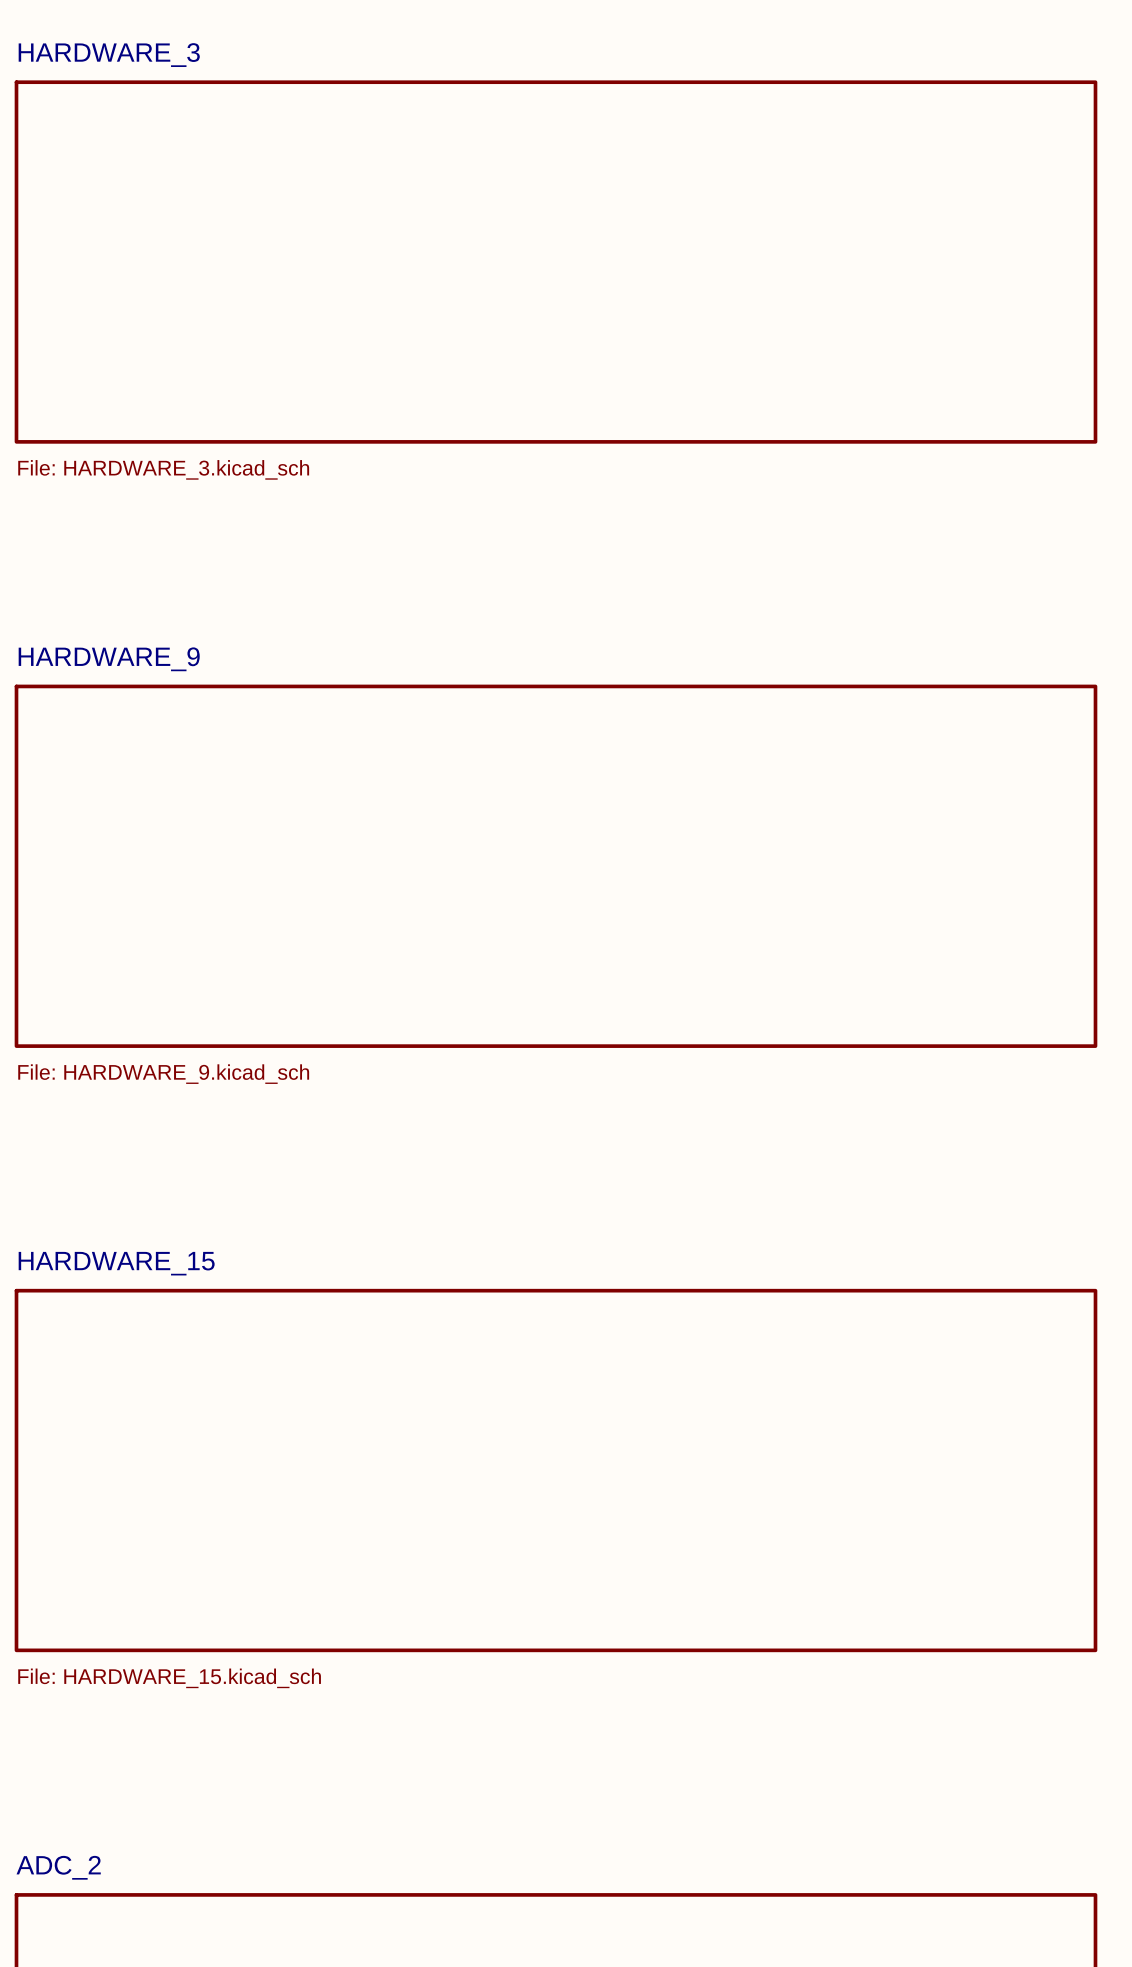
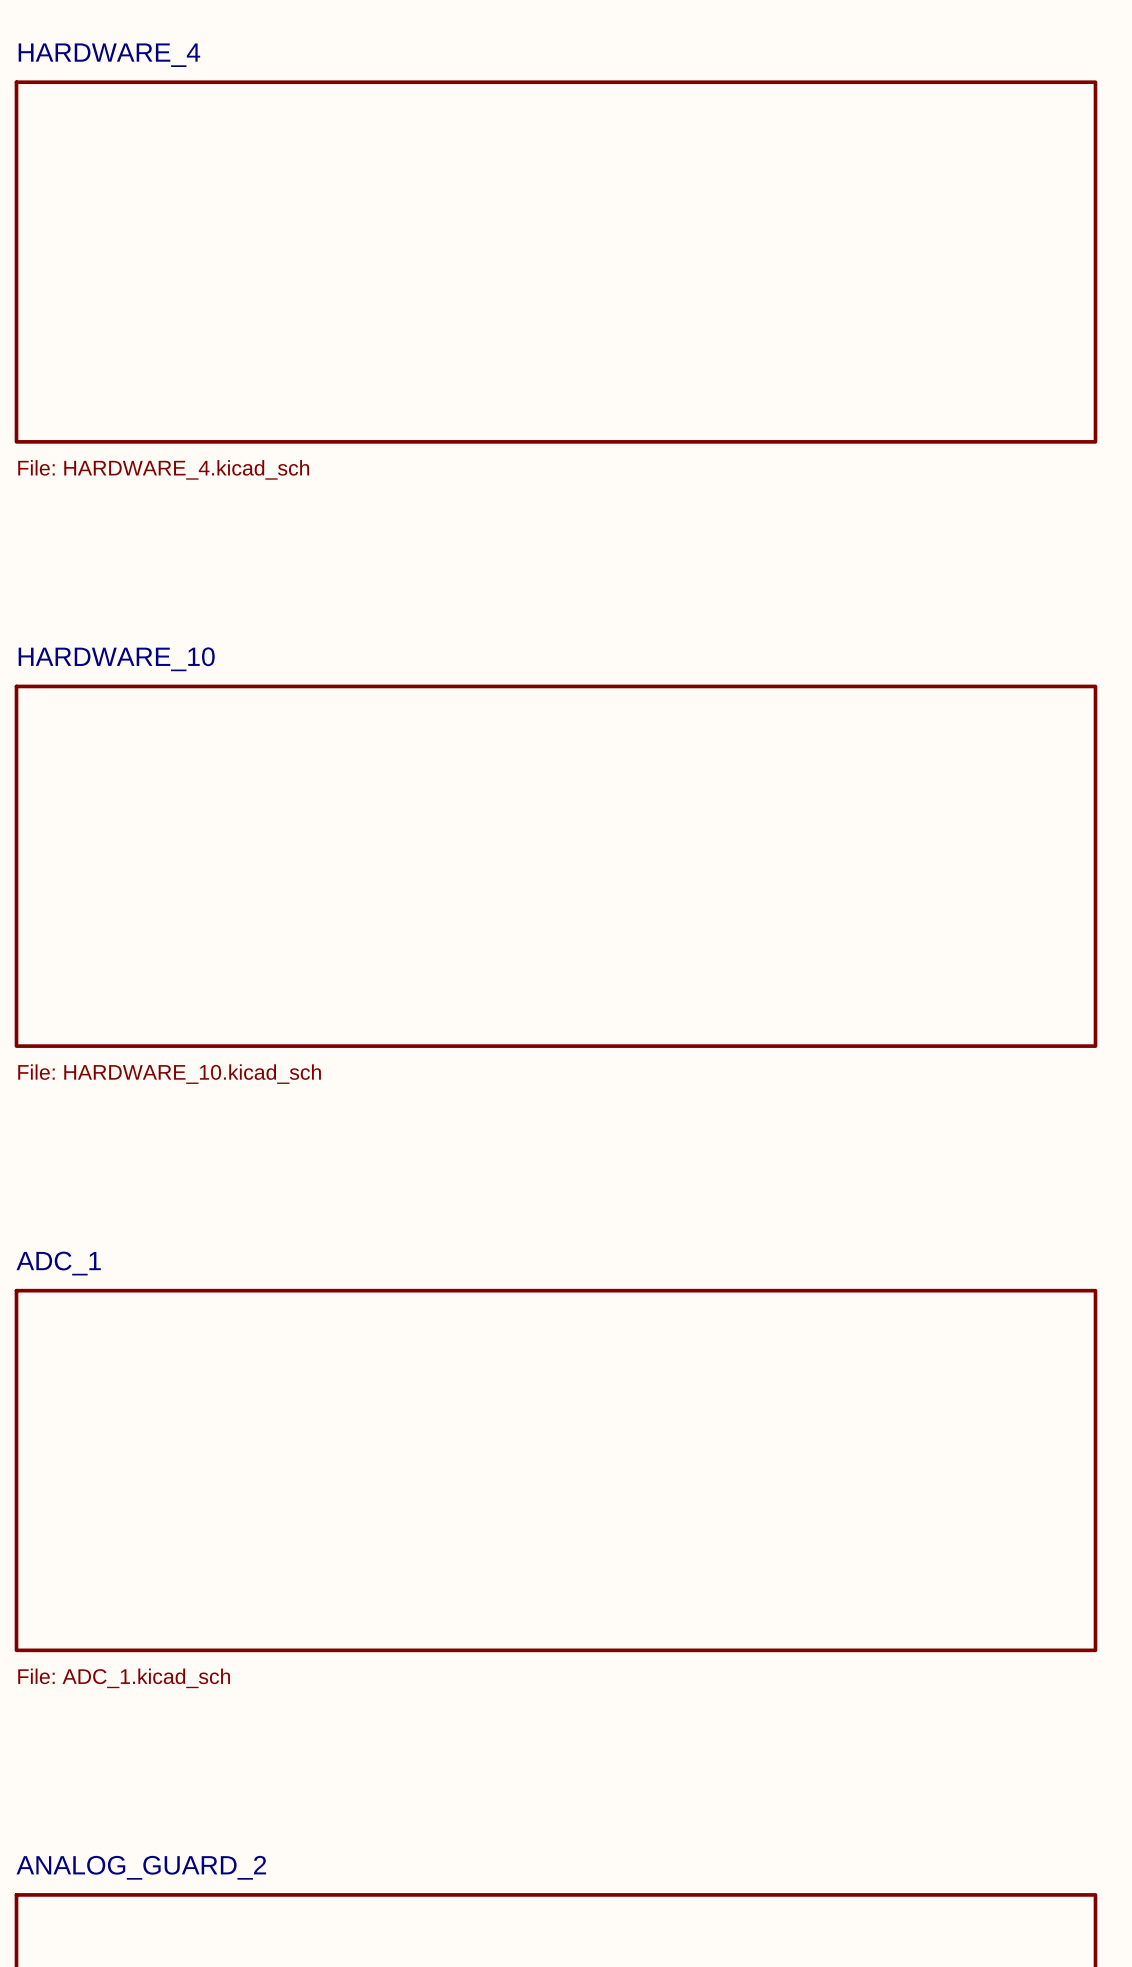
sheet HARDWARE_3 name: HARDWARE_3 (109, 55) -> HARDWARE_4 (109, 55)
sheet HARDWARE_3 value: File: HARDWARE_3.kicad_sch (163, 469) -> File: HARDWARE_4.kicad_sch (163, 469)
sheet HARDWARE_9 name: HARDWARE_9 (109, 659) -> HARDWARE_10 (116, 659)
sheet HARDWARE_9 value: File: HARDWARE_9.kicad_sch (163, 1074) -> File: HARDWARE_10.kicad_sch (169, 1074)
sheet HARDWARE_15 name: HARDWARE_15 (116, 1263) -> ADC_1 (58, 1263)
sheet HARDWARE_15 value: File: HARDWARE_15.kicad_sch (169, 1678) -> File: ADC_1.kicad_sch (124, 1678)
sheet ADC_2 name: ADC_2 (58, 1867) -> ANALOG_GUARD_2 (141, 1867)

